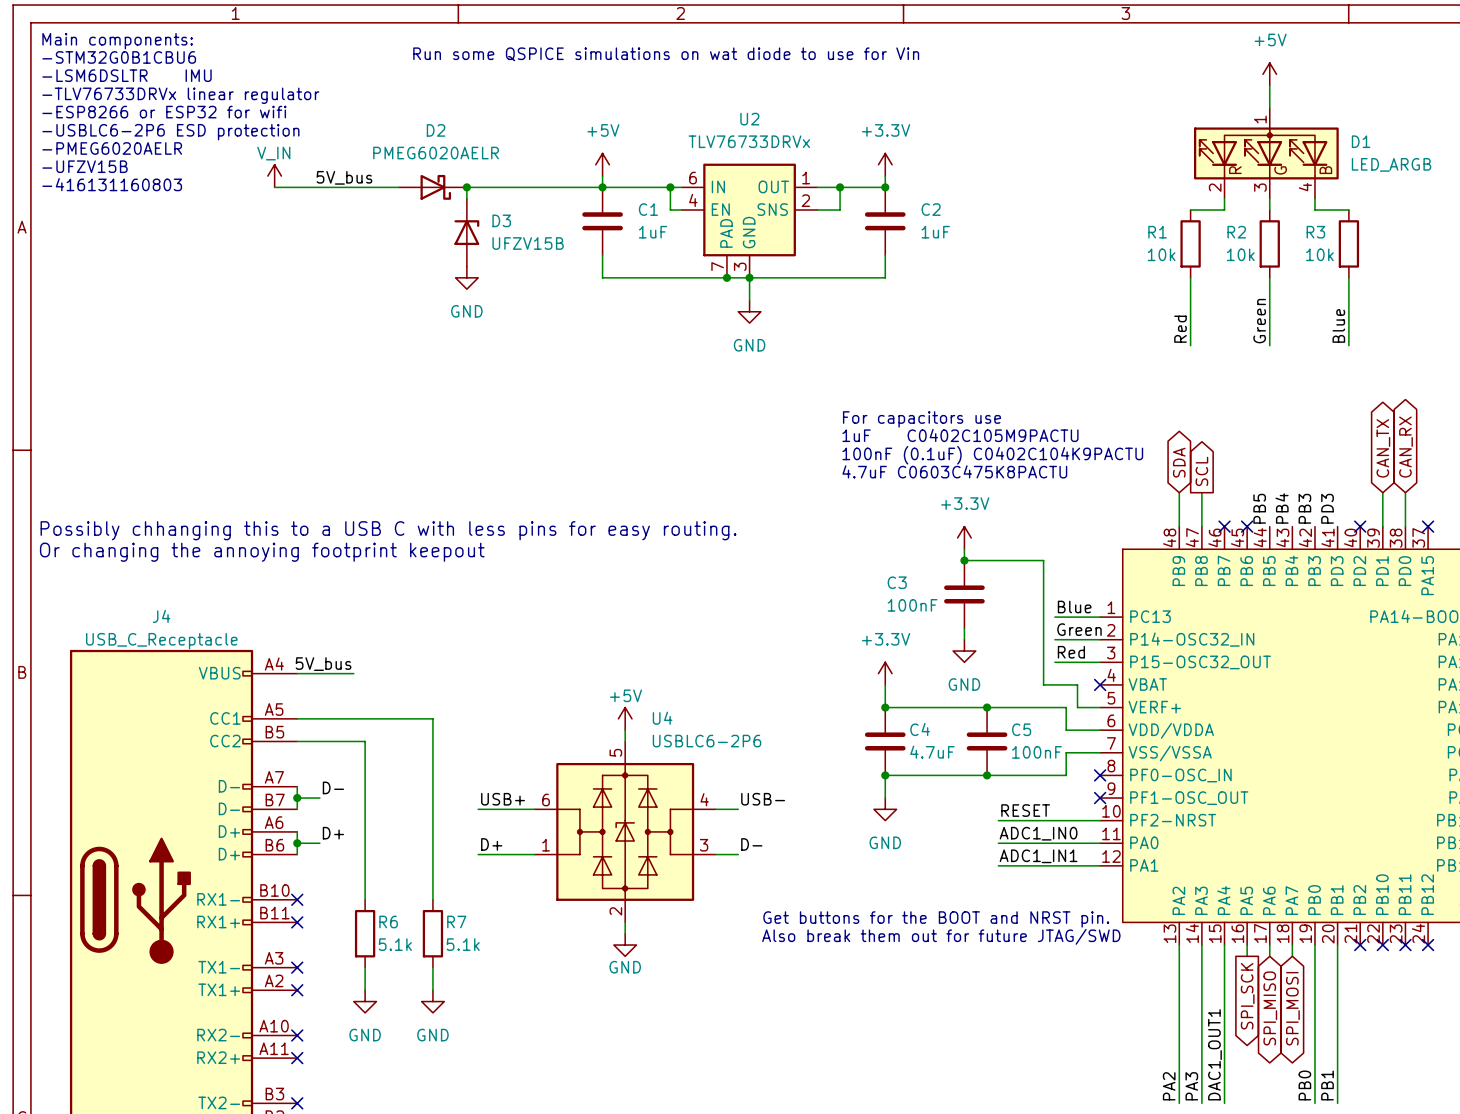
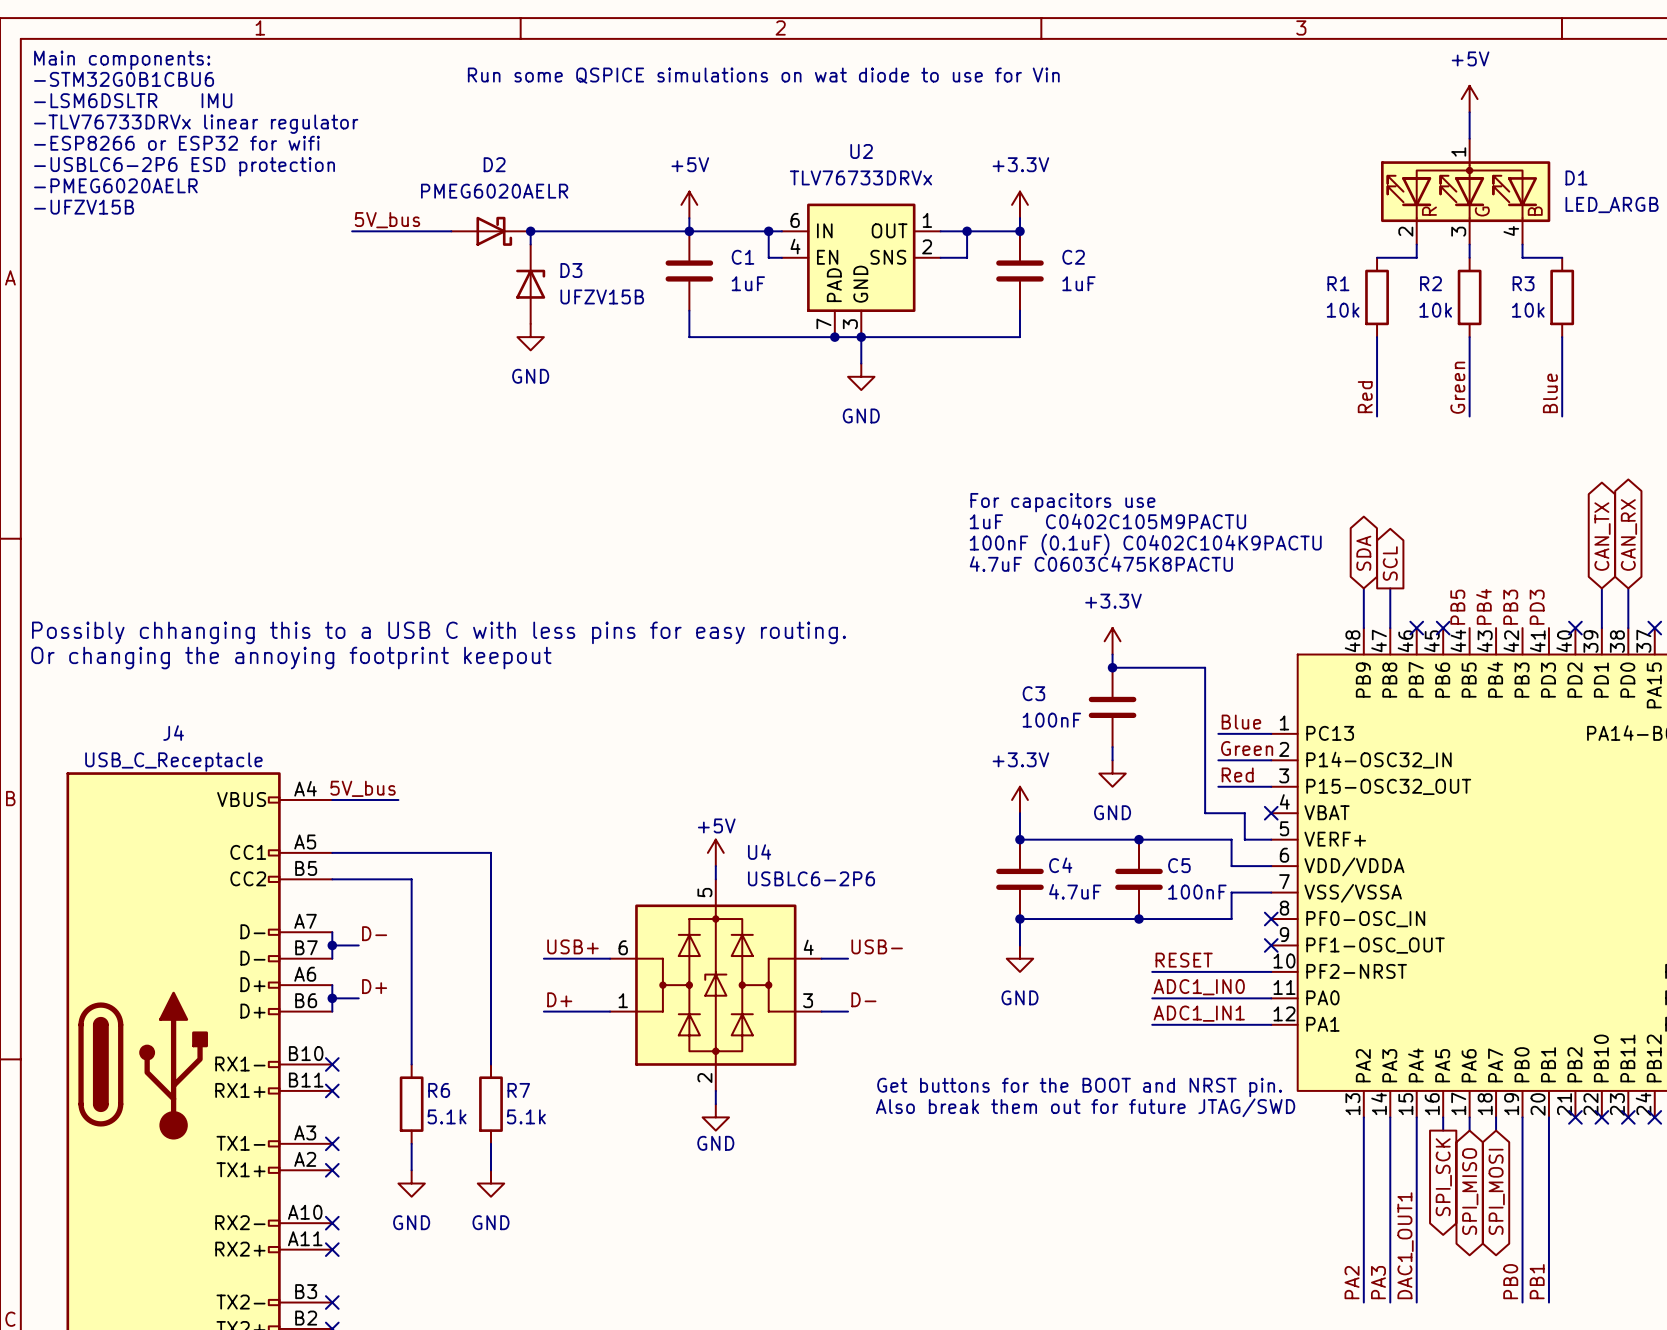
power symbol: V_IN (274, 176) -> none
text: -416131160803 (112, 184) -> none
wire: (274, 187) (314, 187) -> none

